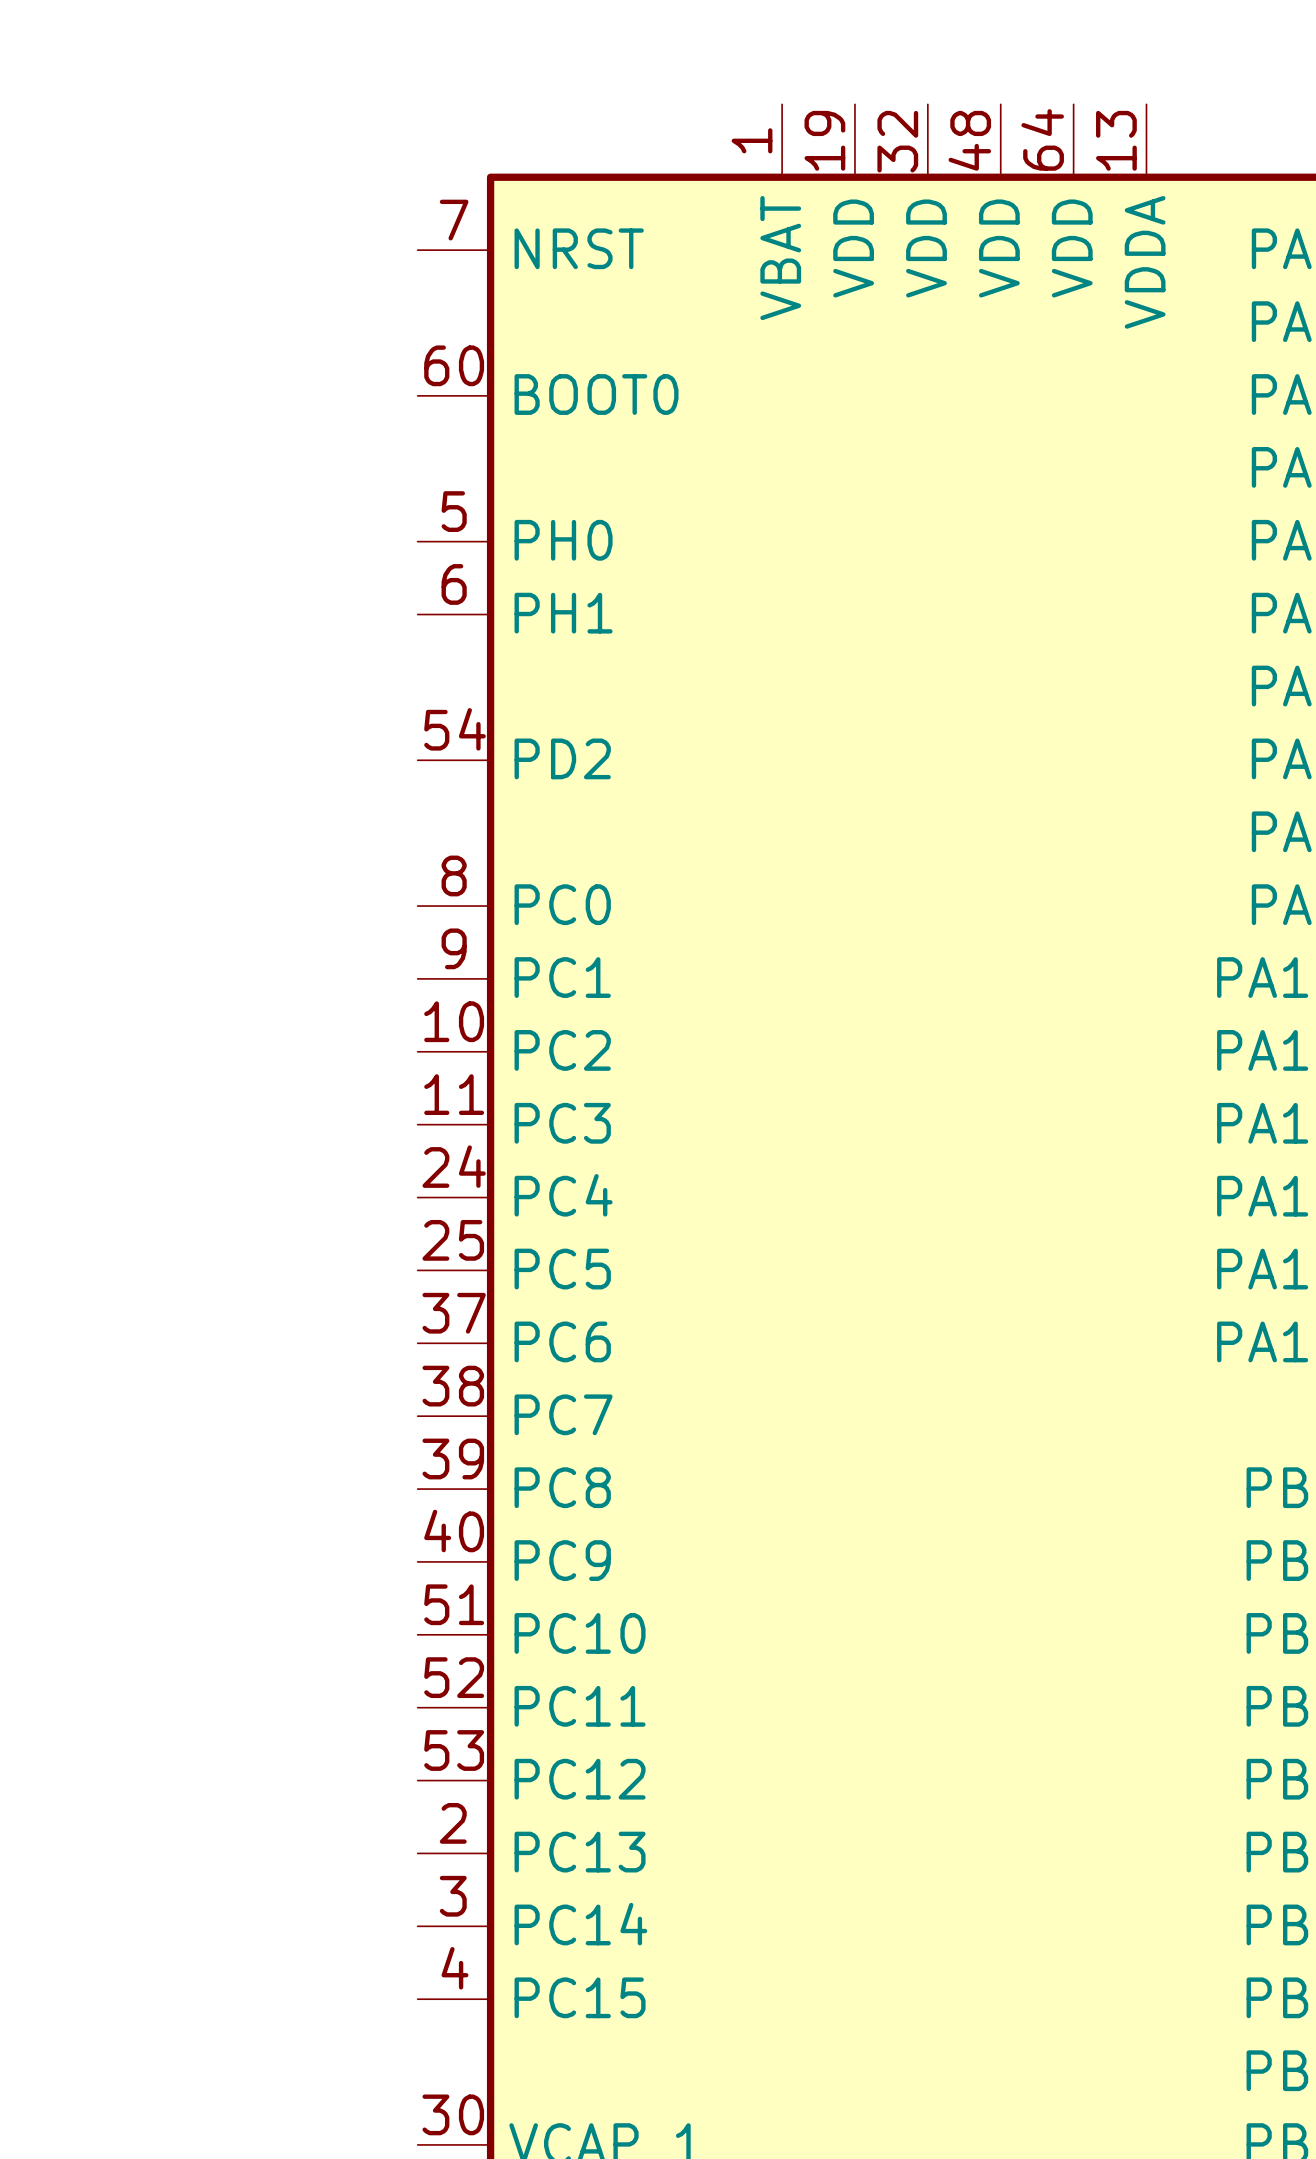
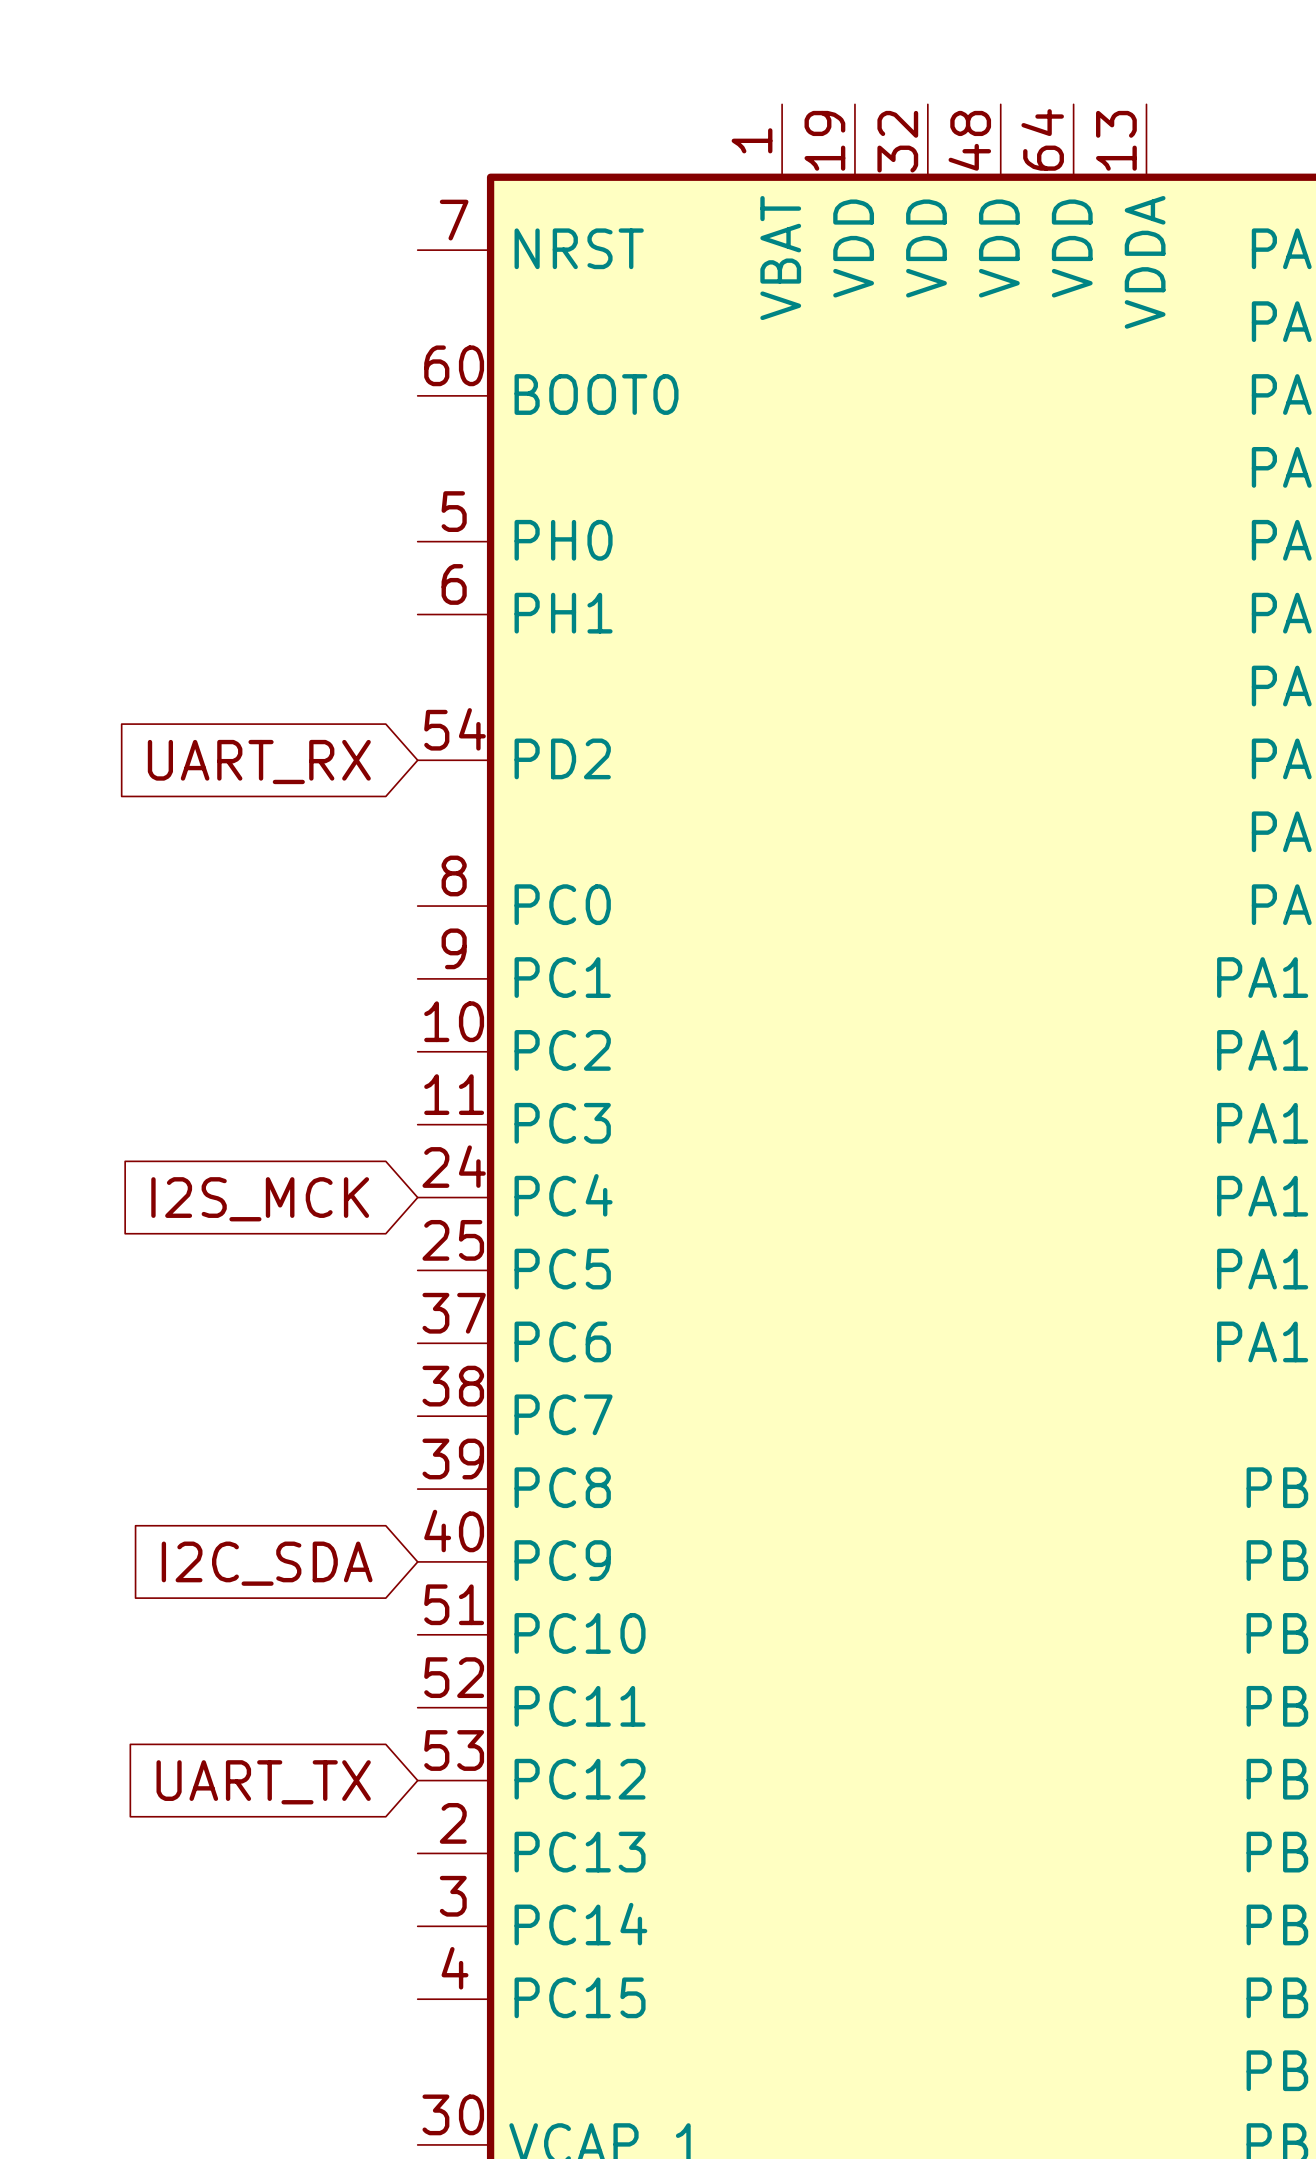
global label: none -> UART_RX (259, 762)
global label: none -> I2S_MCK (260, 1199)
global label: none -> I2C_SDA (267, 1563)
global label: none -> UART_TX (263, 1782)

